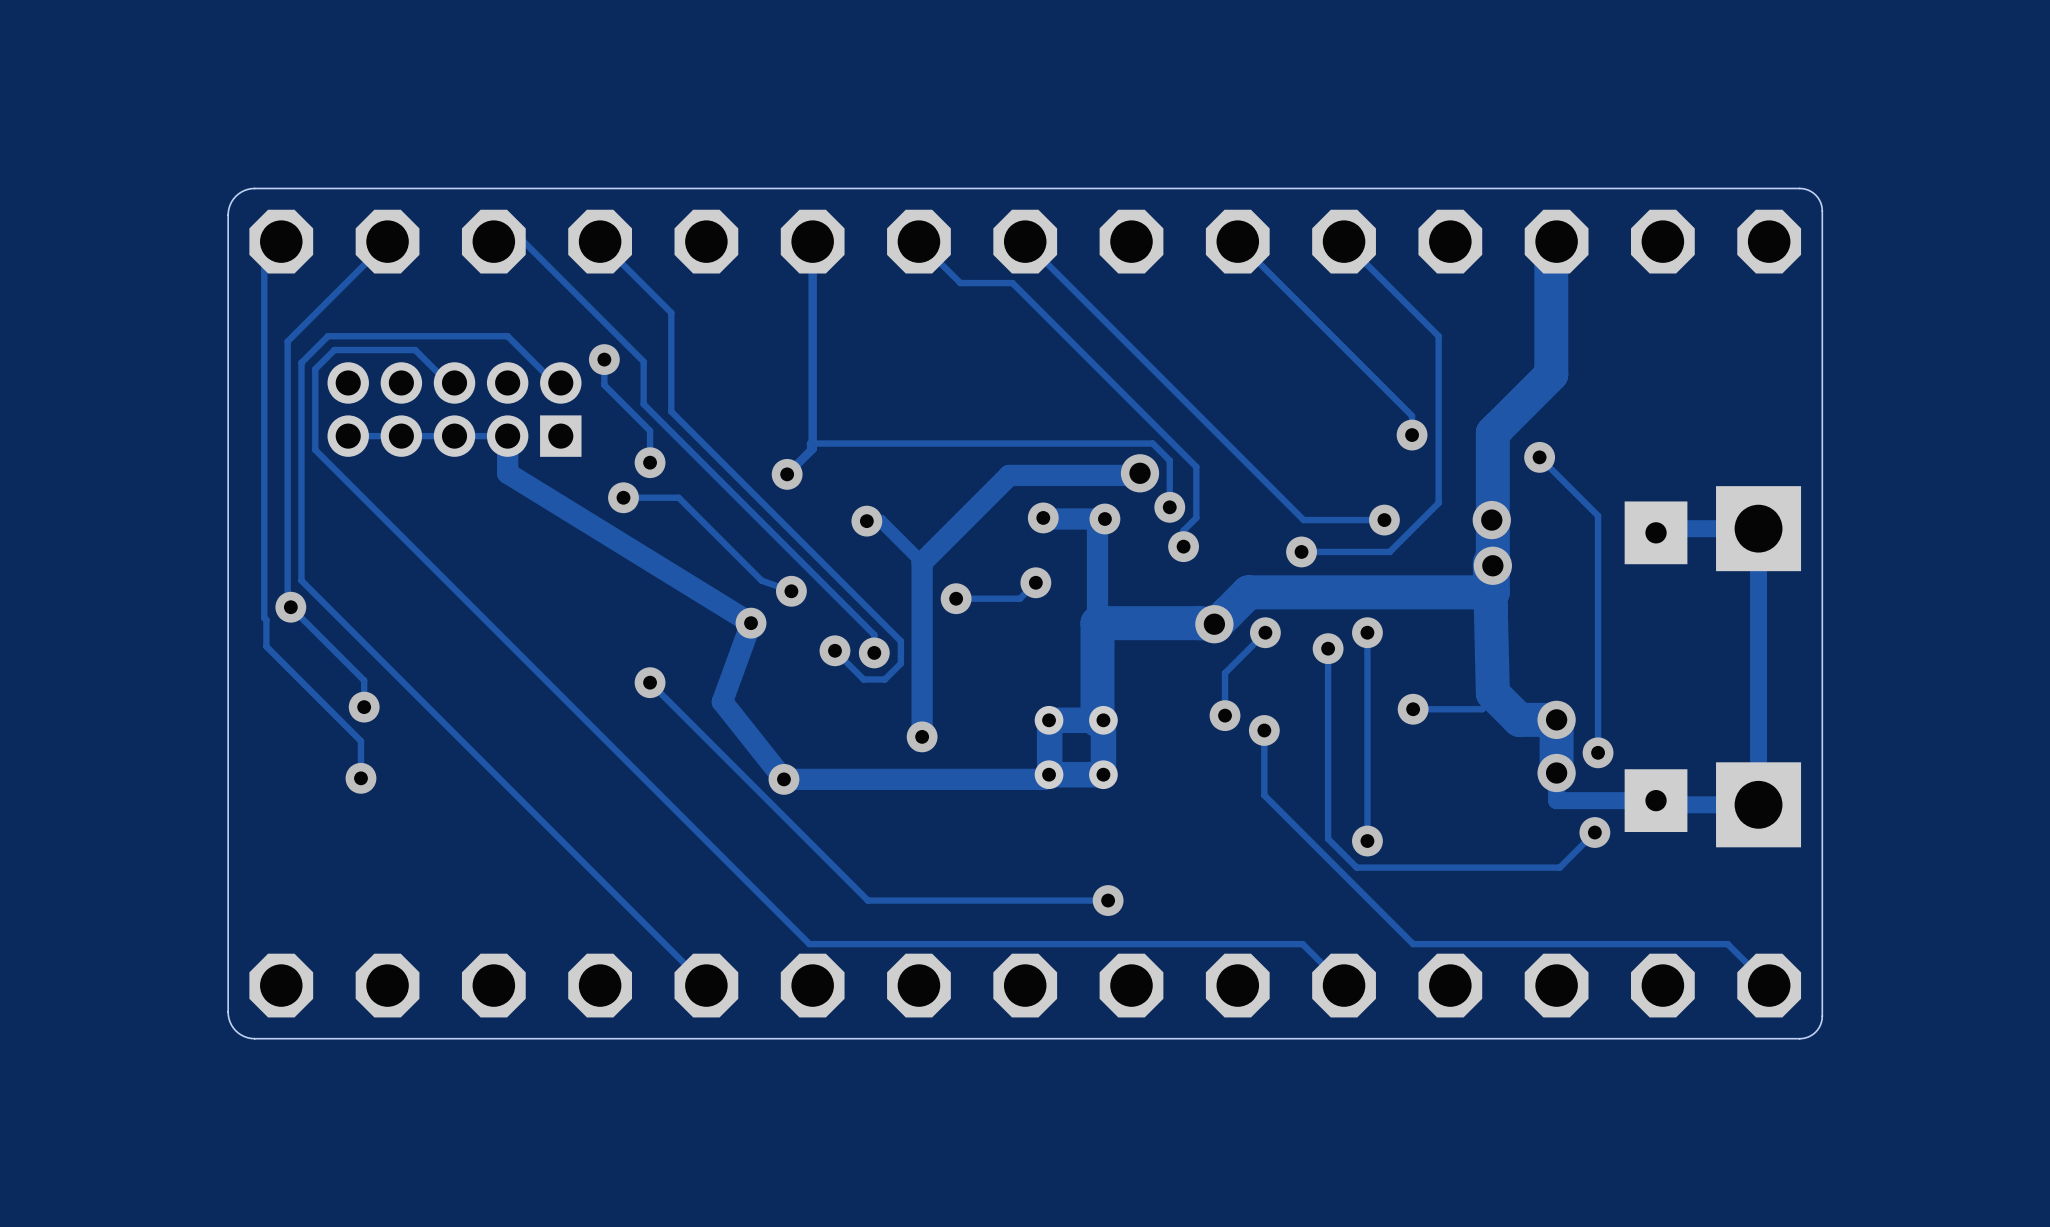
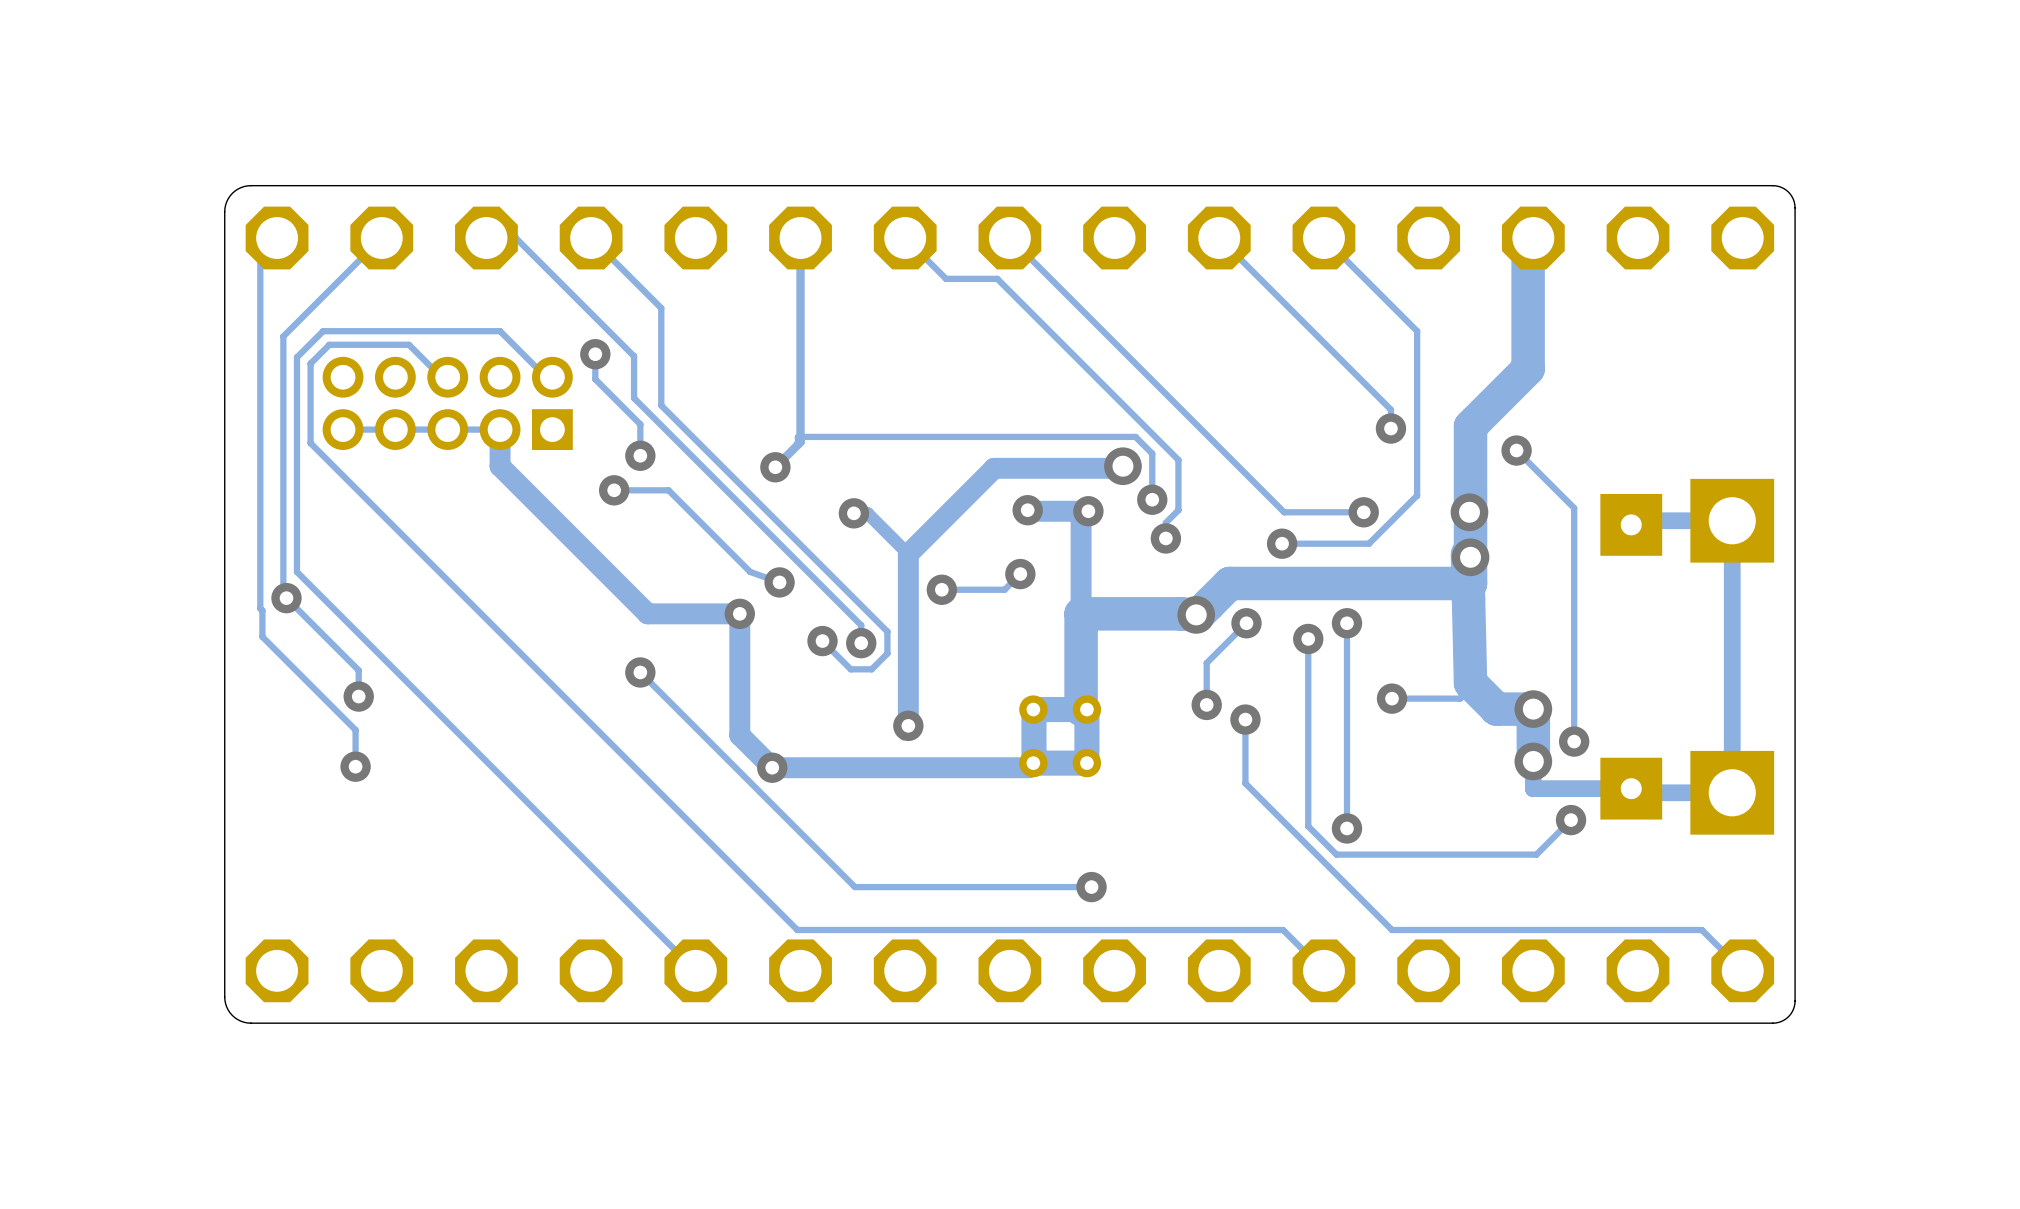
track: (507, 473) (751, 623) (722, 701) (783, 779) -> (500, 466) (647, 613) (739, 613) (739, 735) (772, 767)

